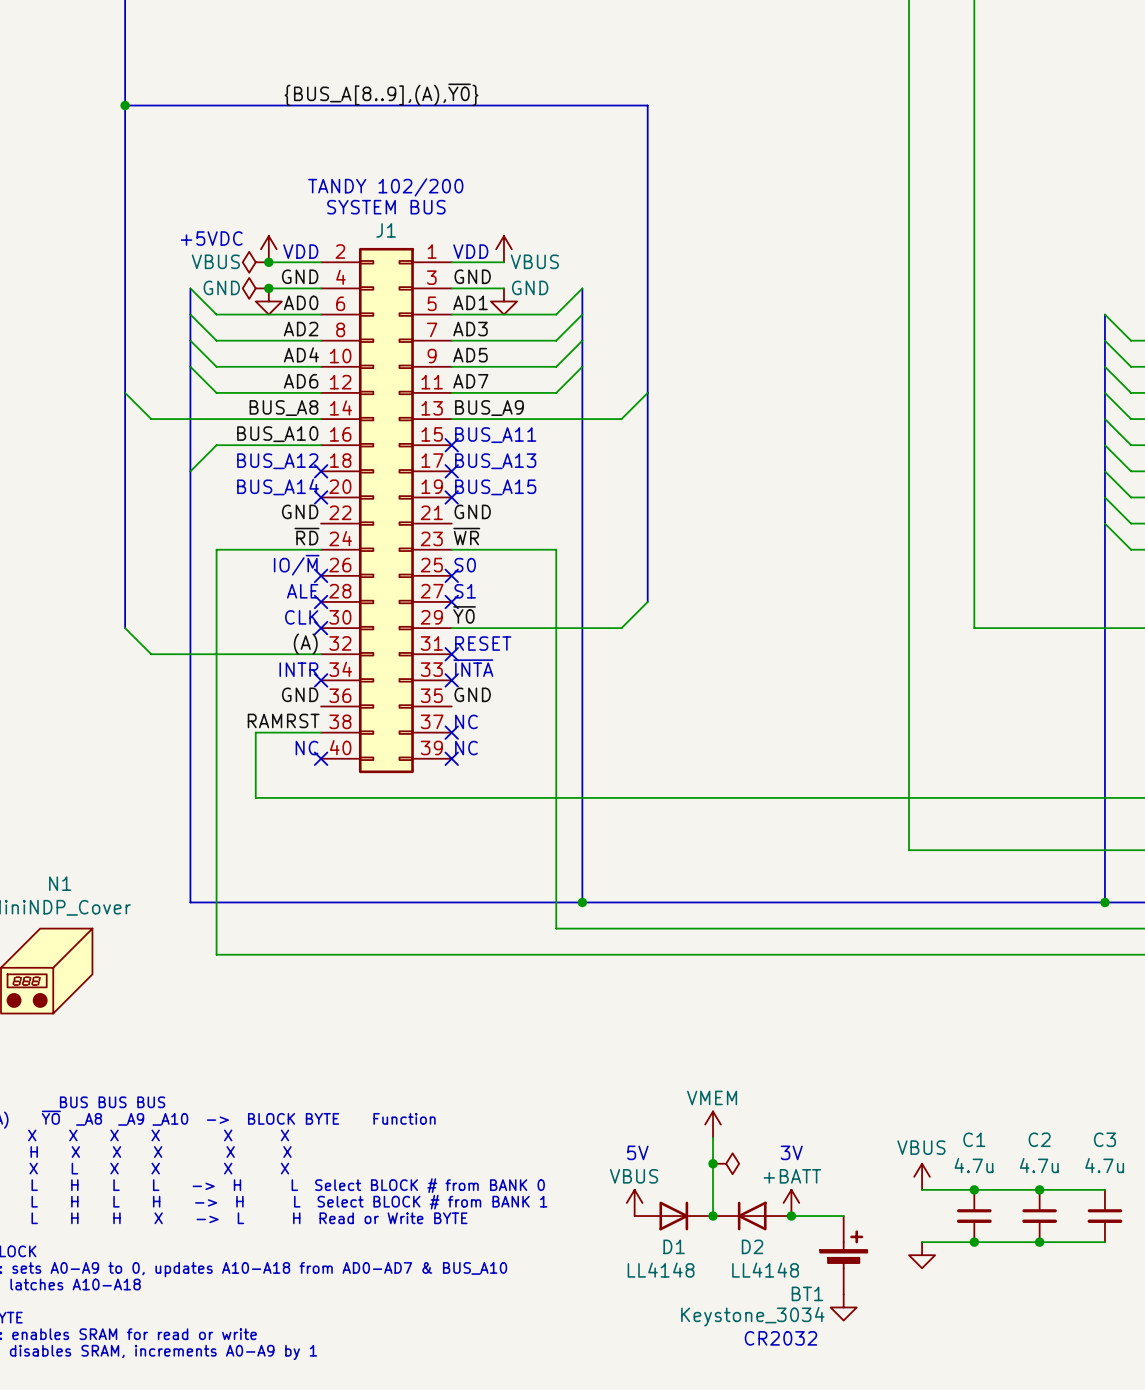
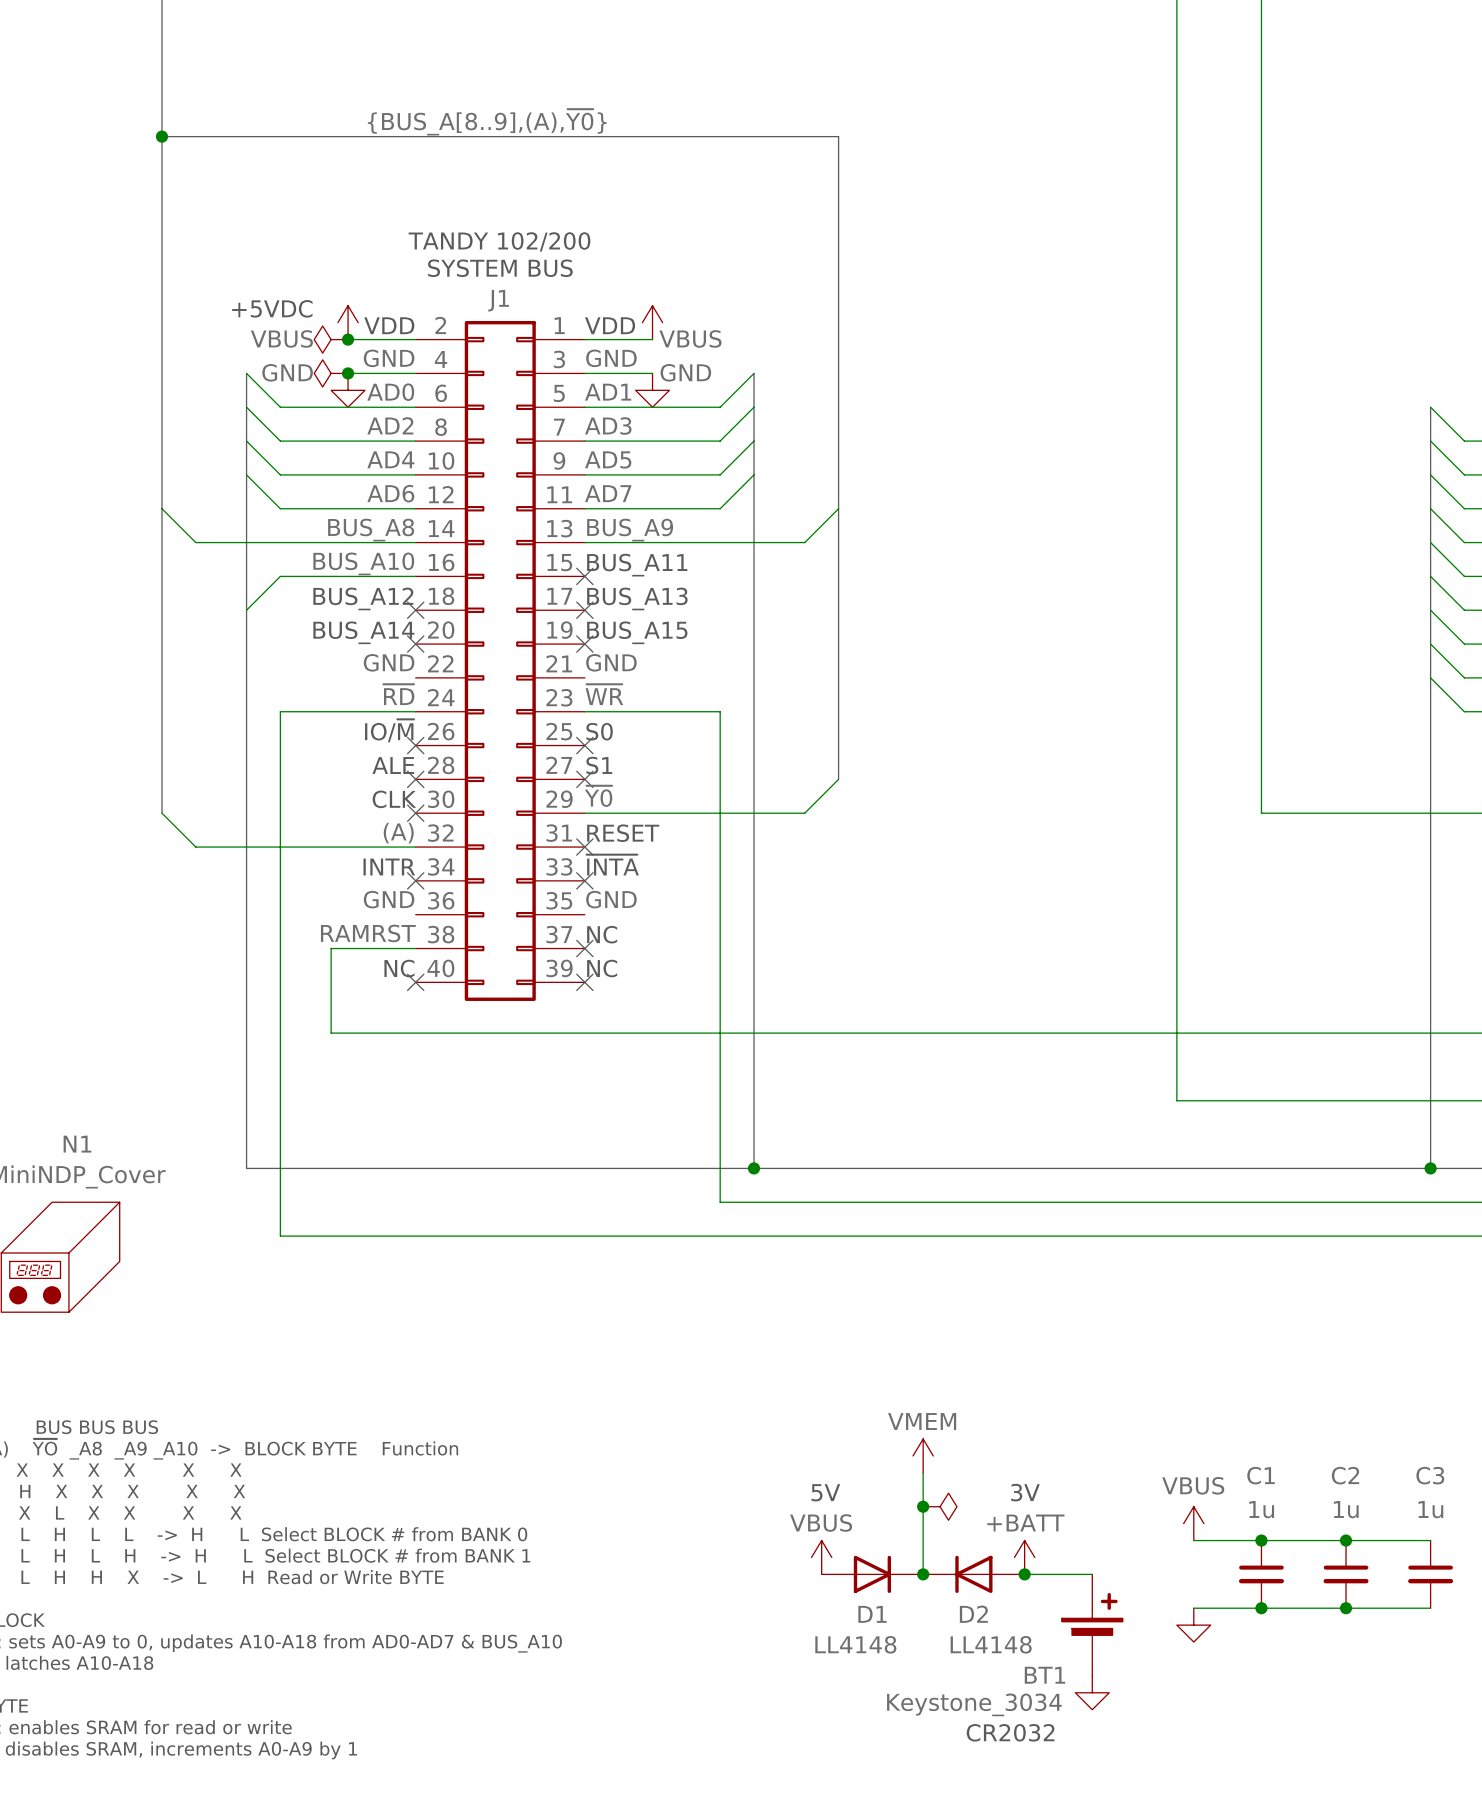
C1 value: 4.7u (974, 1165) -> 1u (1261, 1509)
C2 value: 4.7u (1039, 1165) -> 1u (1346, 1509)
C3 value: 4.7u (1104, 1165) -> 1u (1430, 1509)

